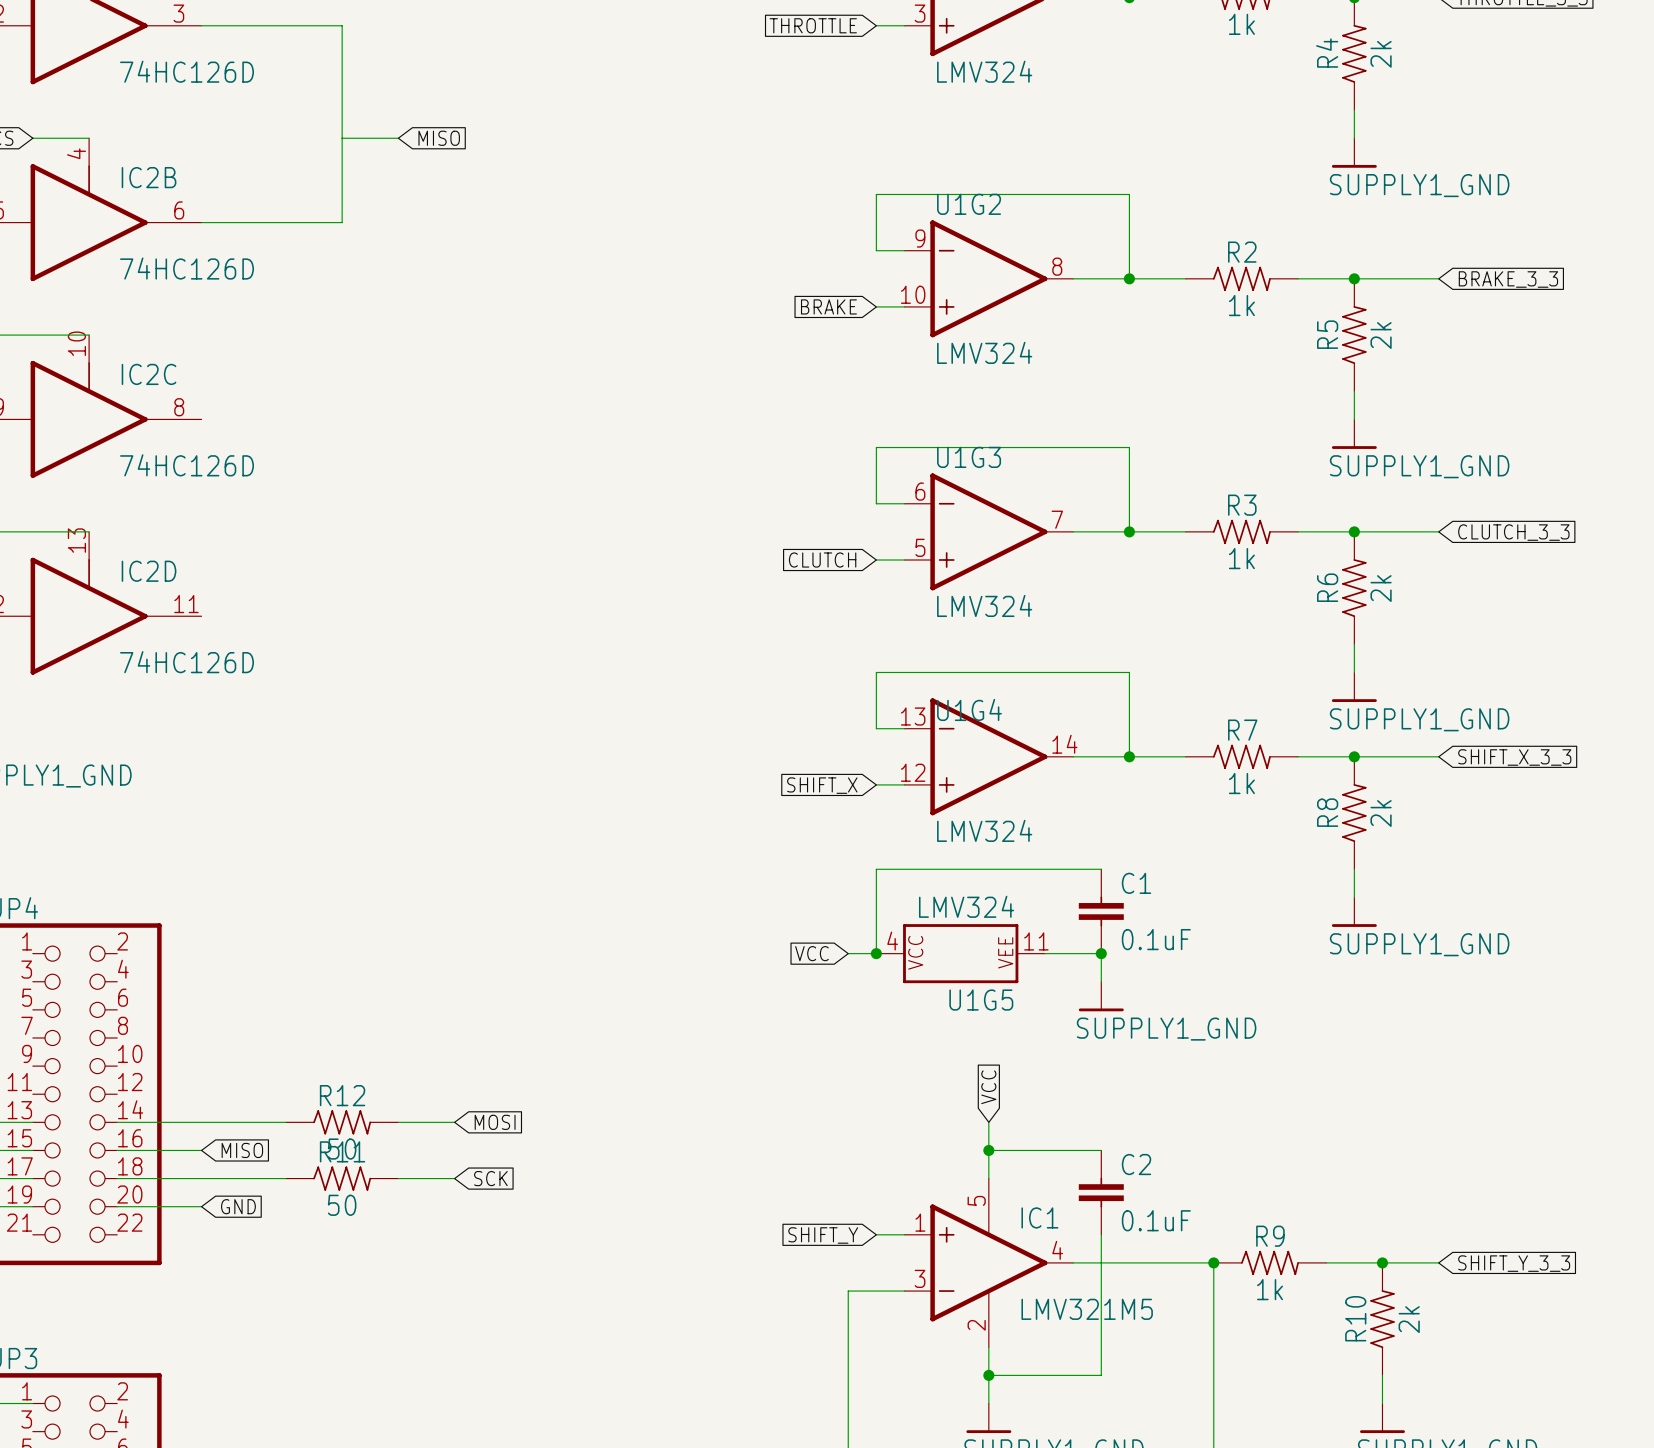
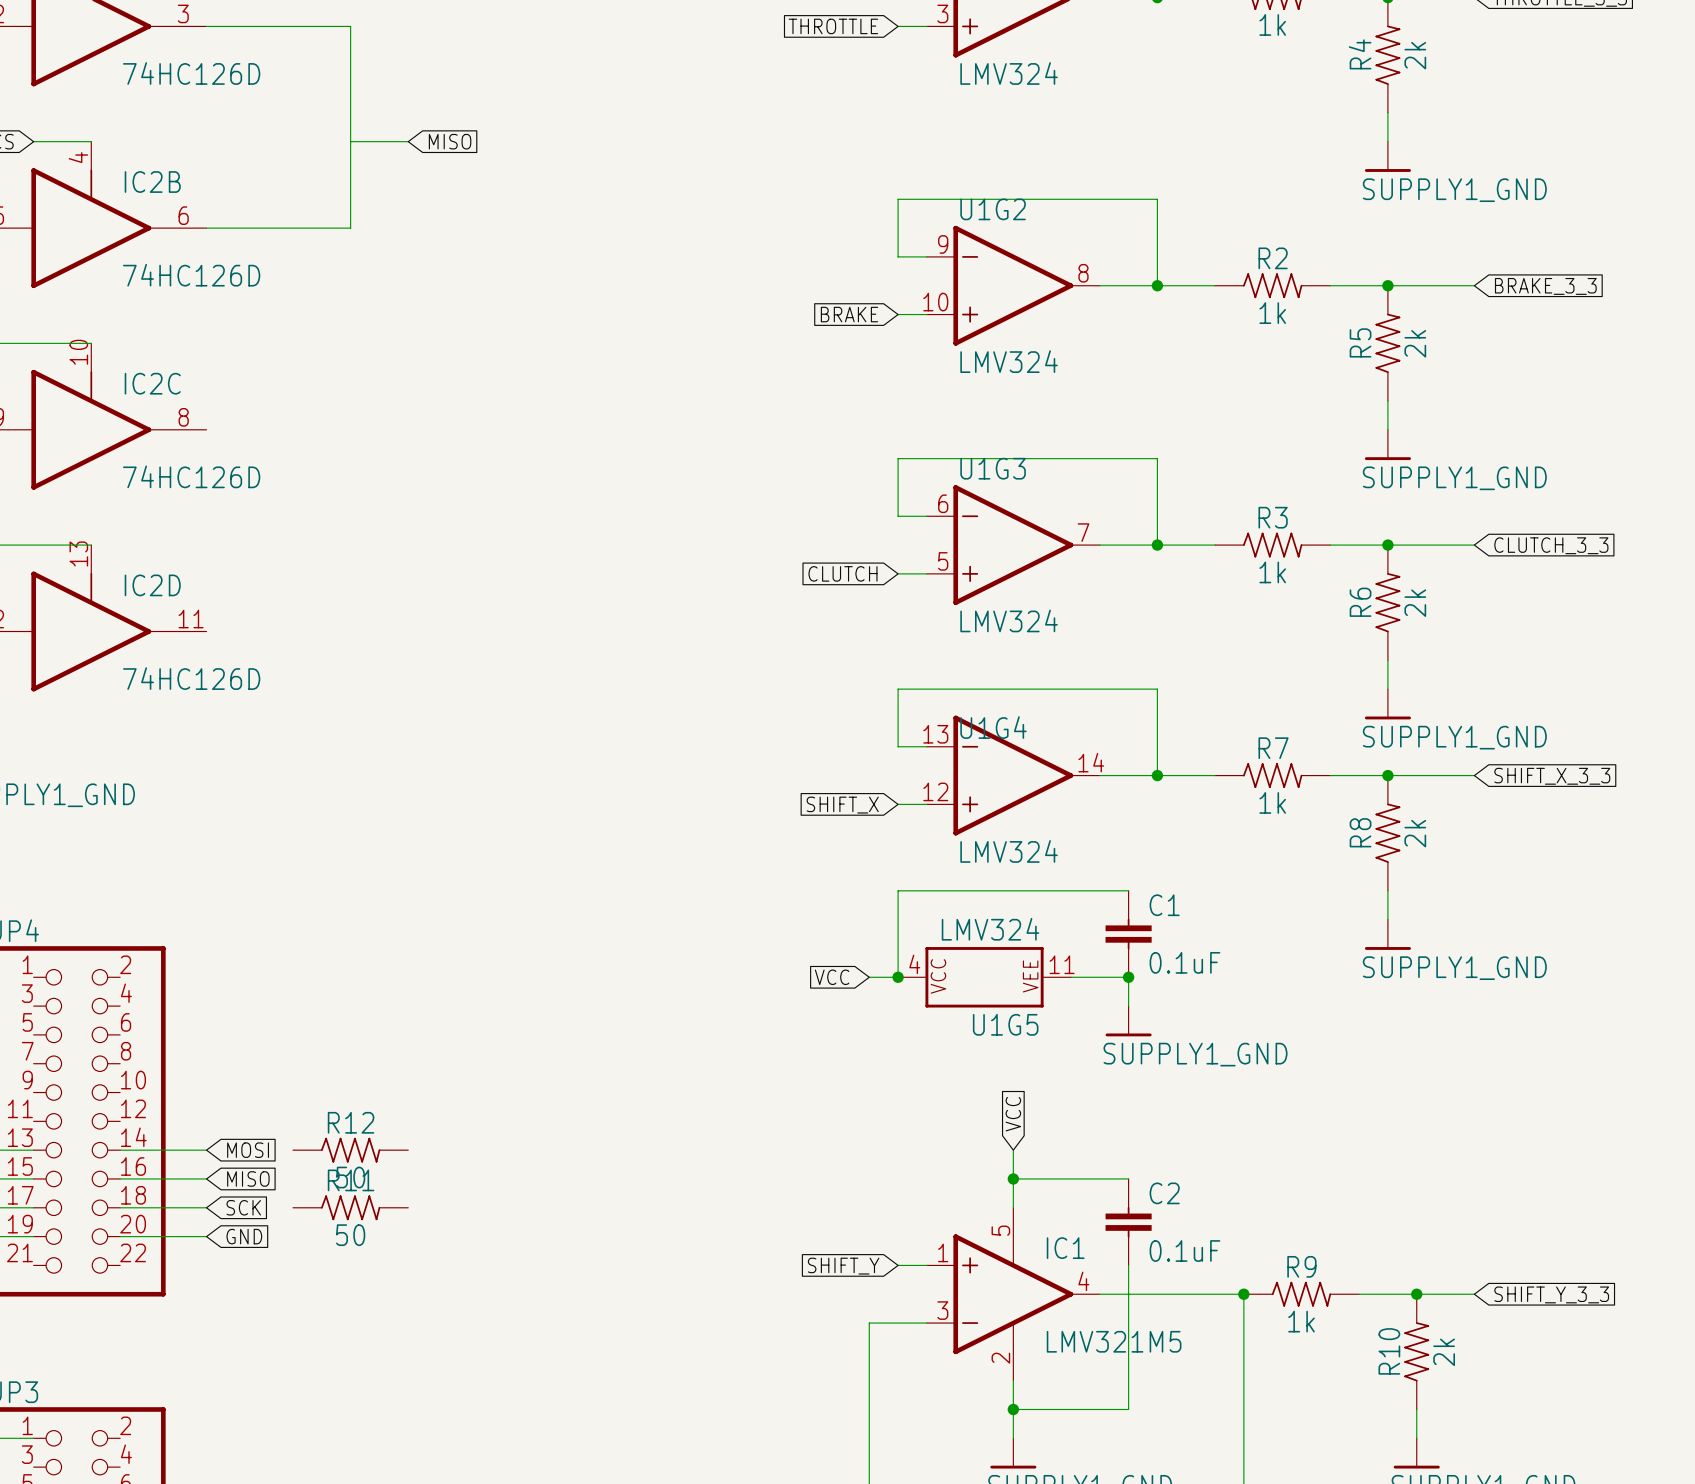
wire: (201, 1122) (285, 1122) -> none
wire: (398, 1122) (454, 1122) -> none
global label position: MOSI (495, 1122) -> MOSI (248, 1150)
wire: (201, 1178) (285, 1178) -> none
wire: (398, 1178) (454, 1178) -> none
global label position: SCK (490, 1178) -> SCK (243, 1207)

